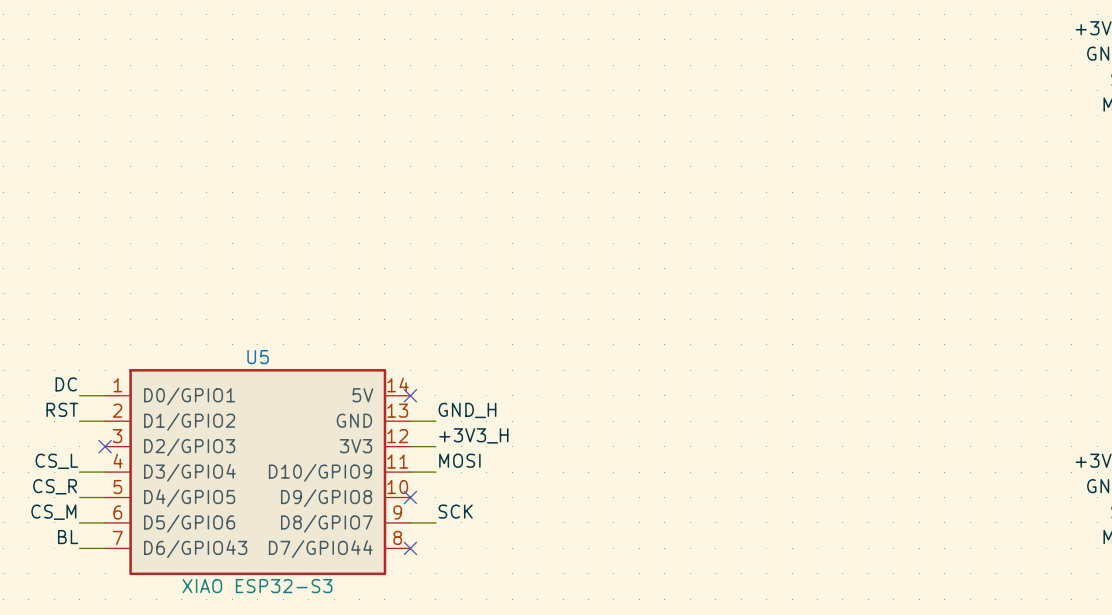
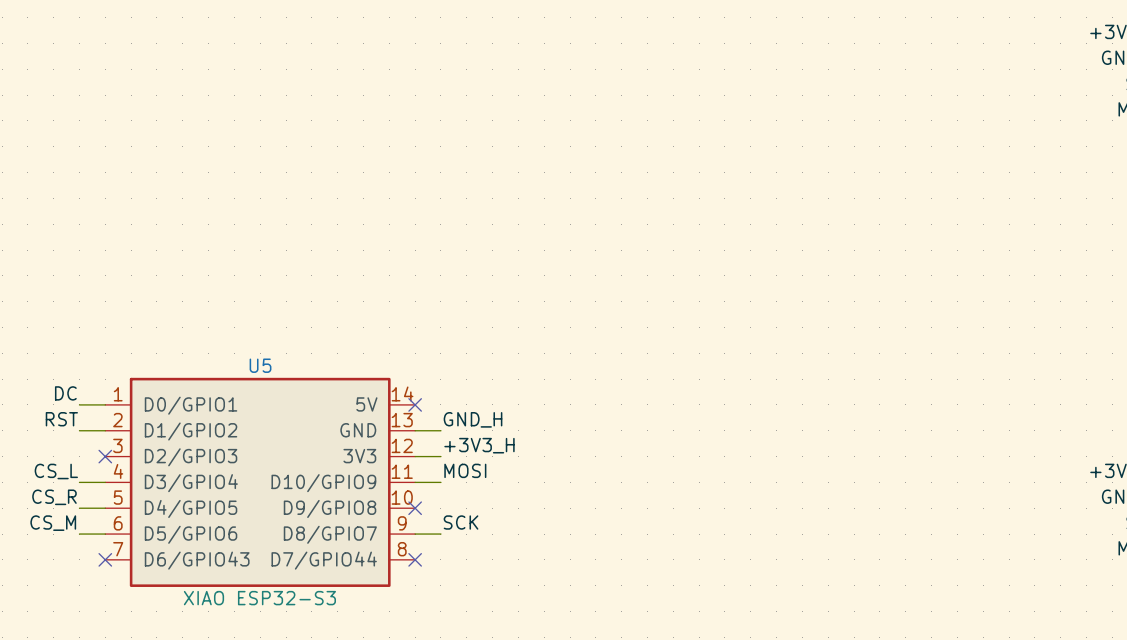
label: BL (68, 537) -> none
wire: (79, 548) (105, 548) -> none
no-connect mark: none -> (105, 559)

